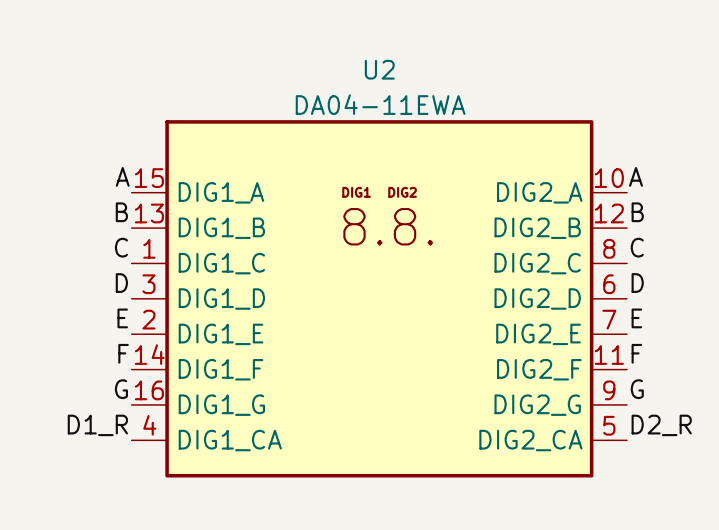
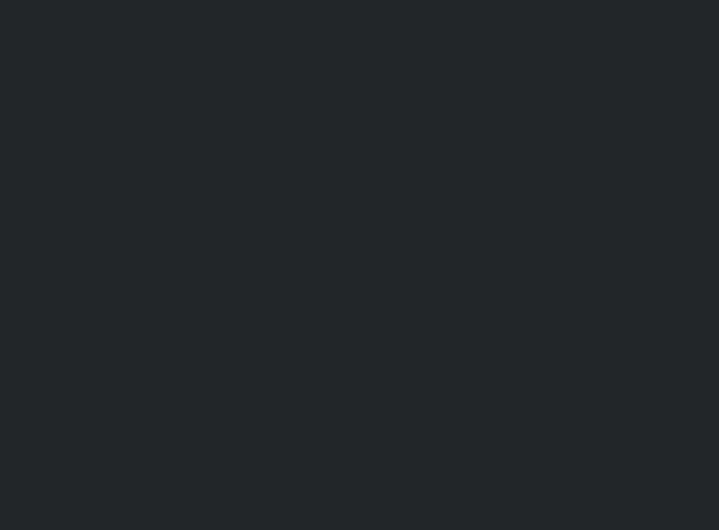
label: A (122, 176) -> none
label: A (636, 176) -> none
label: B (121, 212) -> none
label: B (637, 212) -> none
label: C (121, 247) -> none
label: C (637, 247) -> none
label: D (121, 283) -> none
label: D (637, 283) -> none
U2: DA04-11EWA (379, 298) -> none
label: E (122, 318) -> none
label: E (636, 318) -> none
label: F (123, 353) -> none
label: F (636, 353) -> none
label: G (121, 389) -> none
label: G (637, 389) -> none
label: D1_R (97, 425) -> none
label: D2_R (661, 425) -> none

